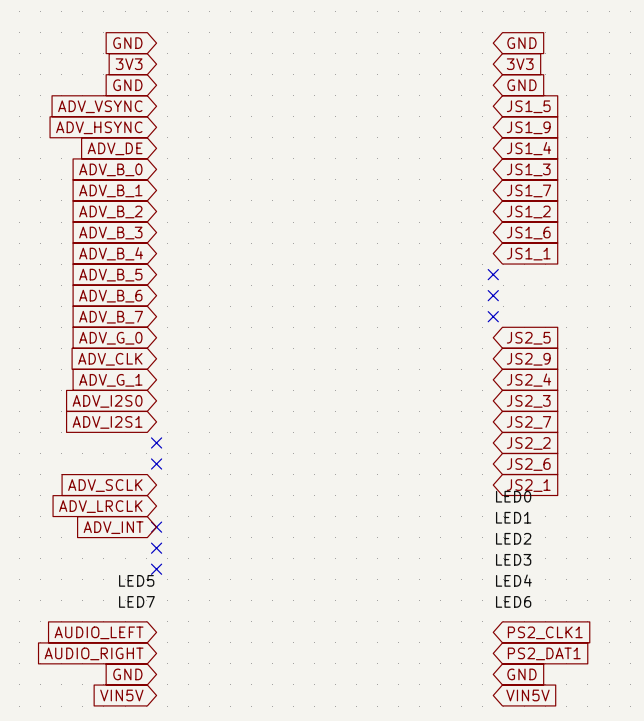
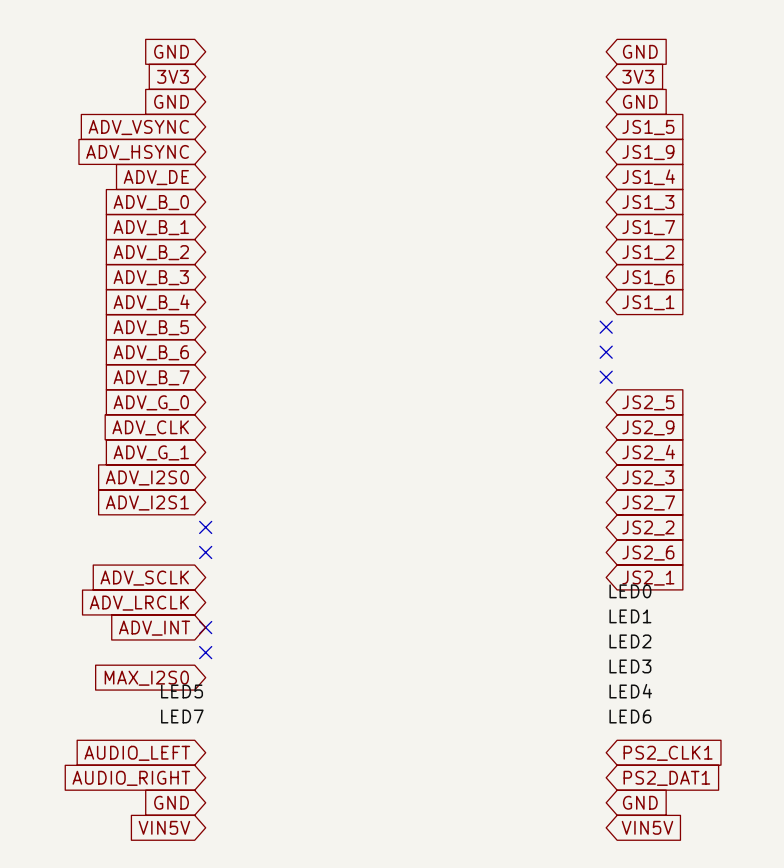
global label: none -> MAX_I2S0 (146, 678)
no-connect mark: (156, 569) -> none

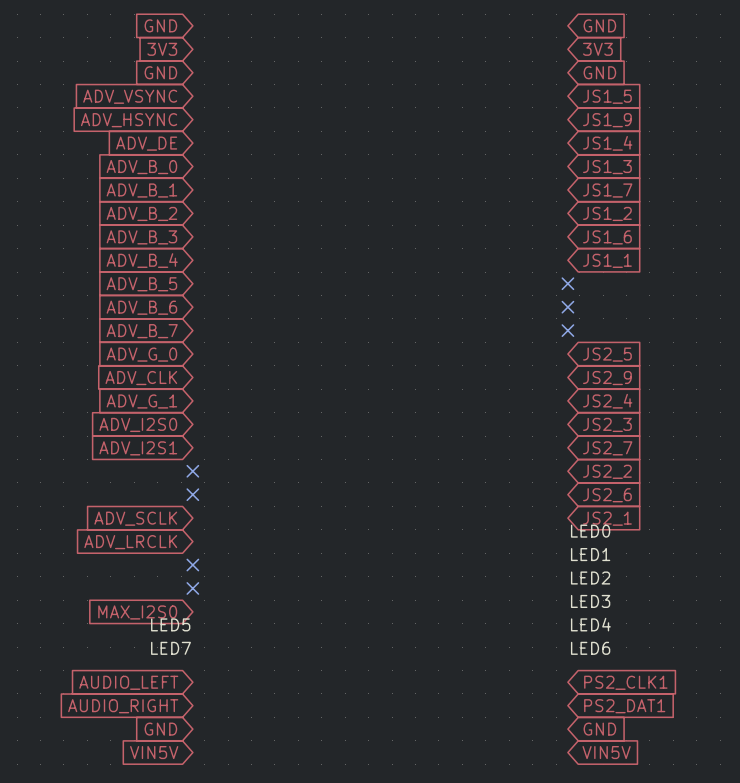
global label: ADV_INT (154, 628) -> none

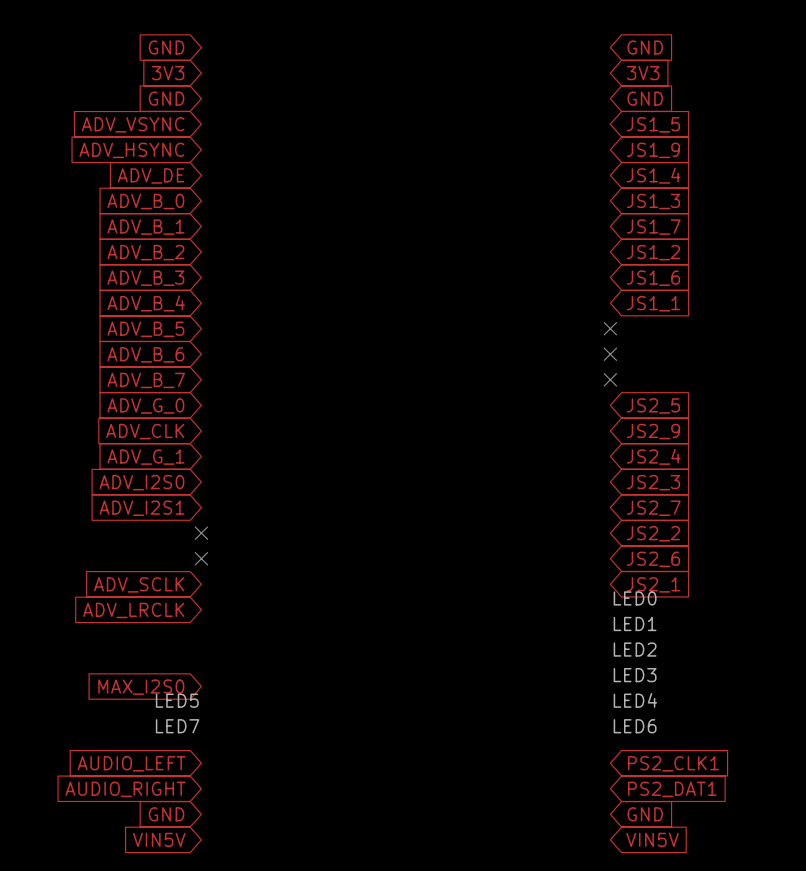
no-connect mark: (192, 565) -> none
no-connect mark: (192, 588) -> none

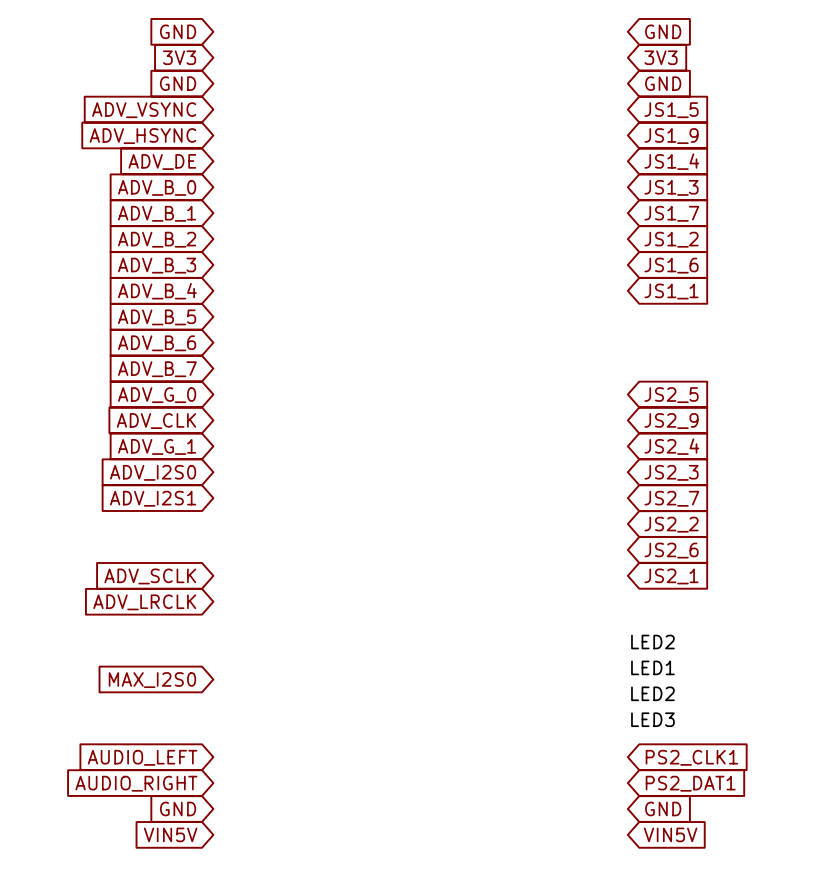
no-connect mark: (610, 328) -> none
no-connect mark: (610, 354) -> none
no-connect mark: (610, 379) -> none
no-connect mark: (201, 533) -> none
no-connect mark: (201, 558) -> none
label: LED0 (635, 598) -> none
label: LED1 (635, 624) -> none
label: LED3 (635, 675) -> LED1 (652, 667)
label: LED5 (177, 700) -> none
label: LED4 (635, 700) -> LED2 (652, 693)
label: LED7 (177, 726) -> none
label: LED6 (635, 726) -> LED3 (652, 719)

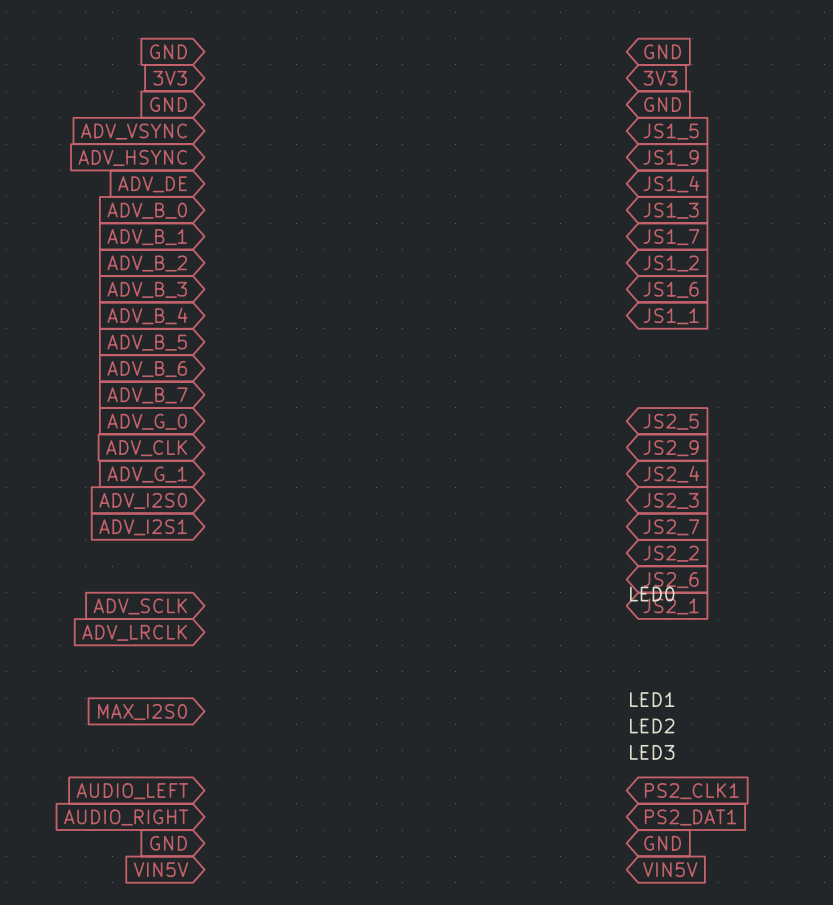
label: none -> LED0 (652, 594)
label: LED2 (652, 642) -> none

